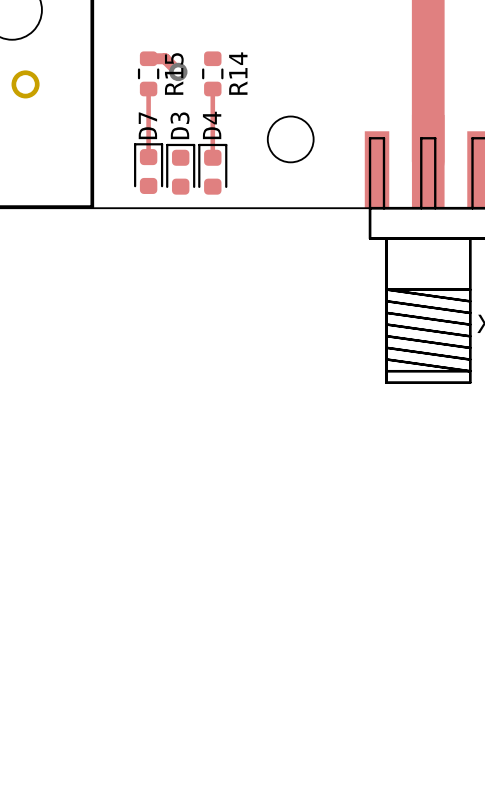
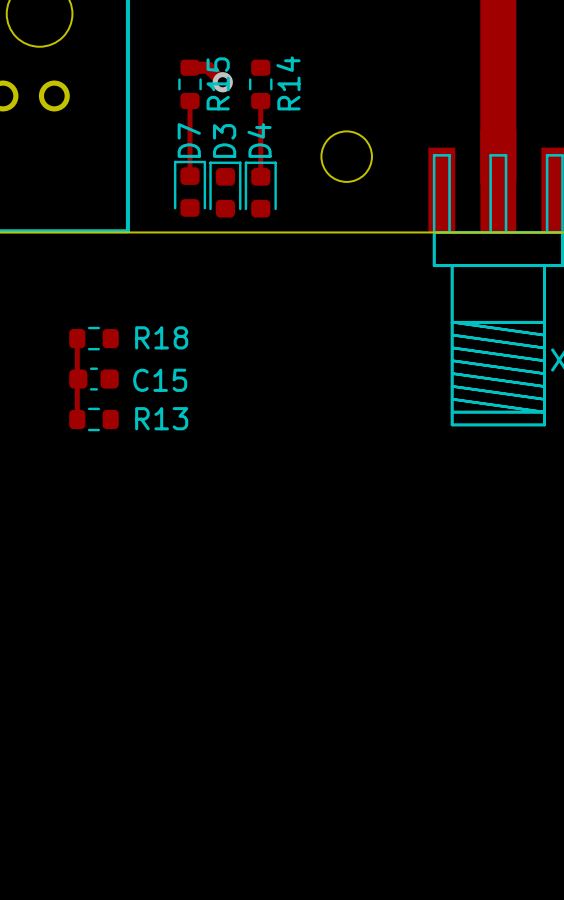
track: none -> (77, 338) (77, 419)
R18: none -> (93, 338)
C15: none -> (93, 379)
R13: none -> (93, 419)

